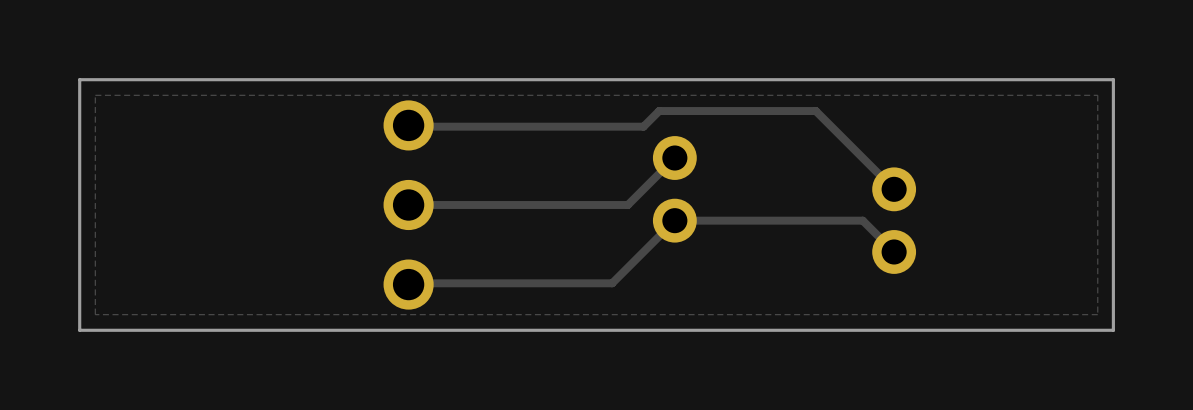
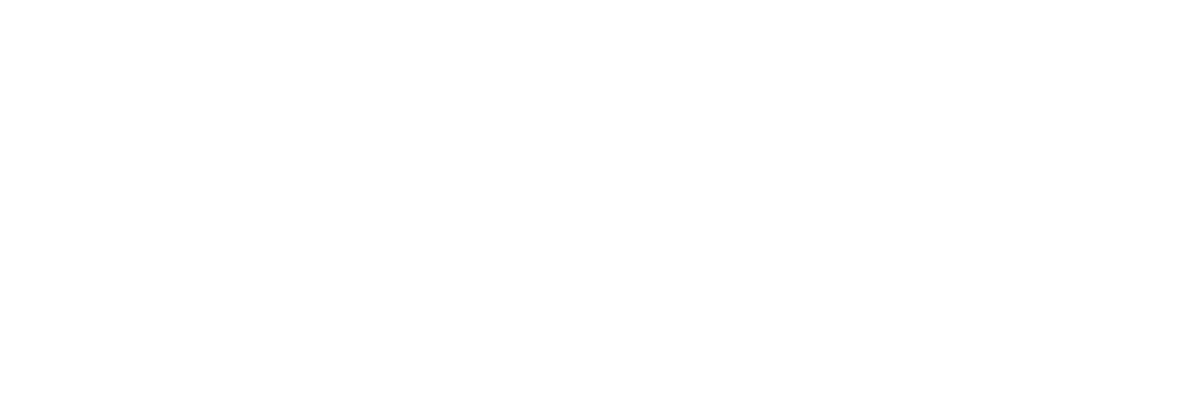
board edge: (1113, 79) (79, 79) (79, 330) (1113, 330) (1113, 79) -> none
zone outline: (1097, 95) (1097, 314) (95, 314) (95, 95) (1097, 95) -> none
track: (408, 125) (643, 126) (659, 111) (815, 111) (894, 189) -> none
track: (674, 158) (627, 204) (408, 204) -> none
part: (674, 189) -> none
part: (408, 204) -> none
part: (894, 220) -> none
track: (894, 251) (862, 220) (674, 220) (612, 283) (408, 284) -> none

